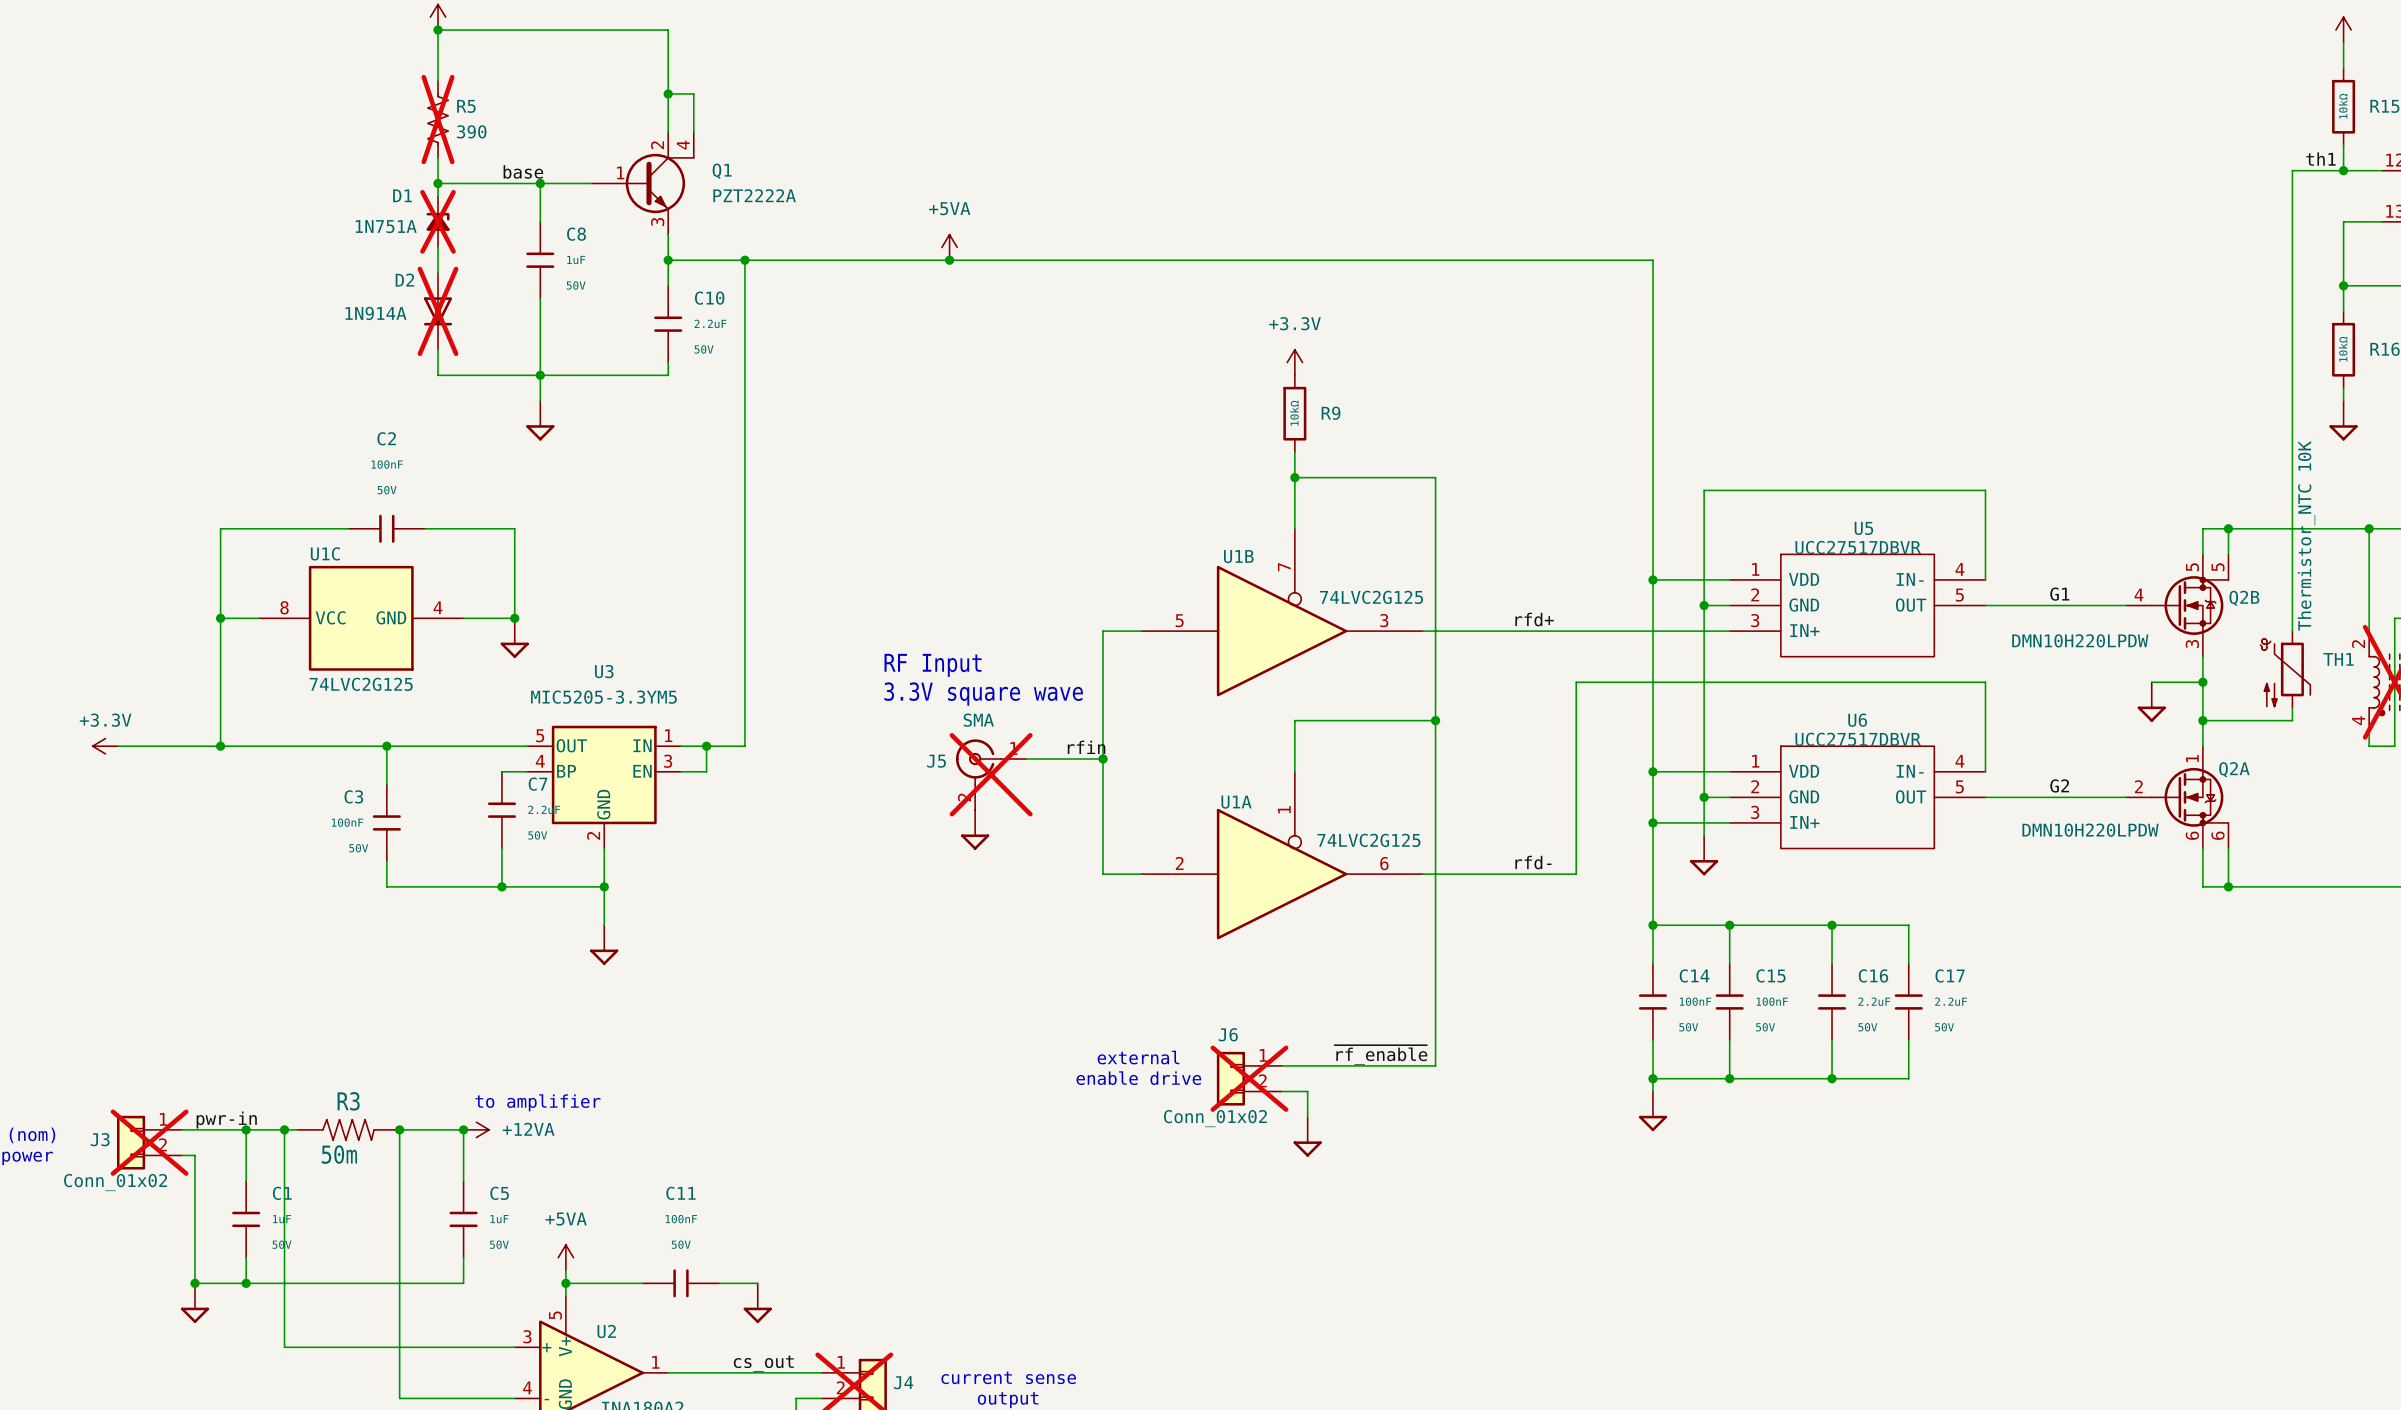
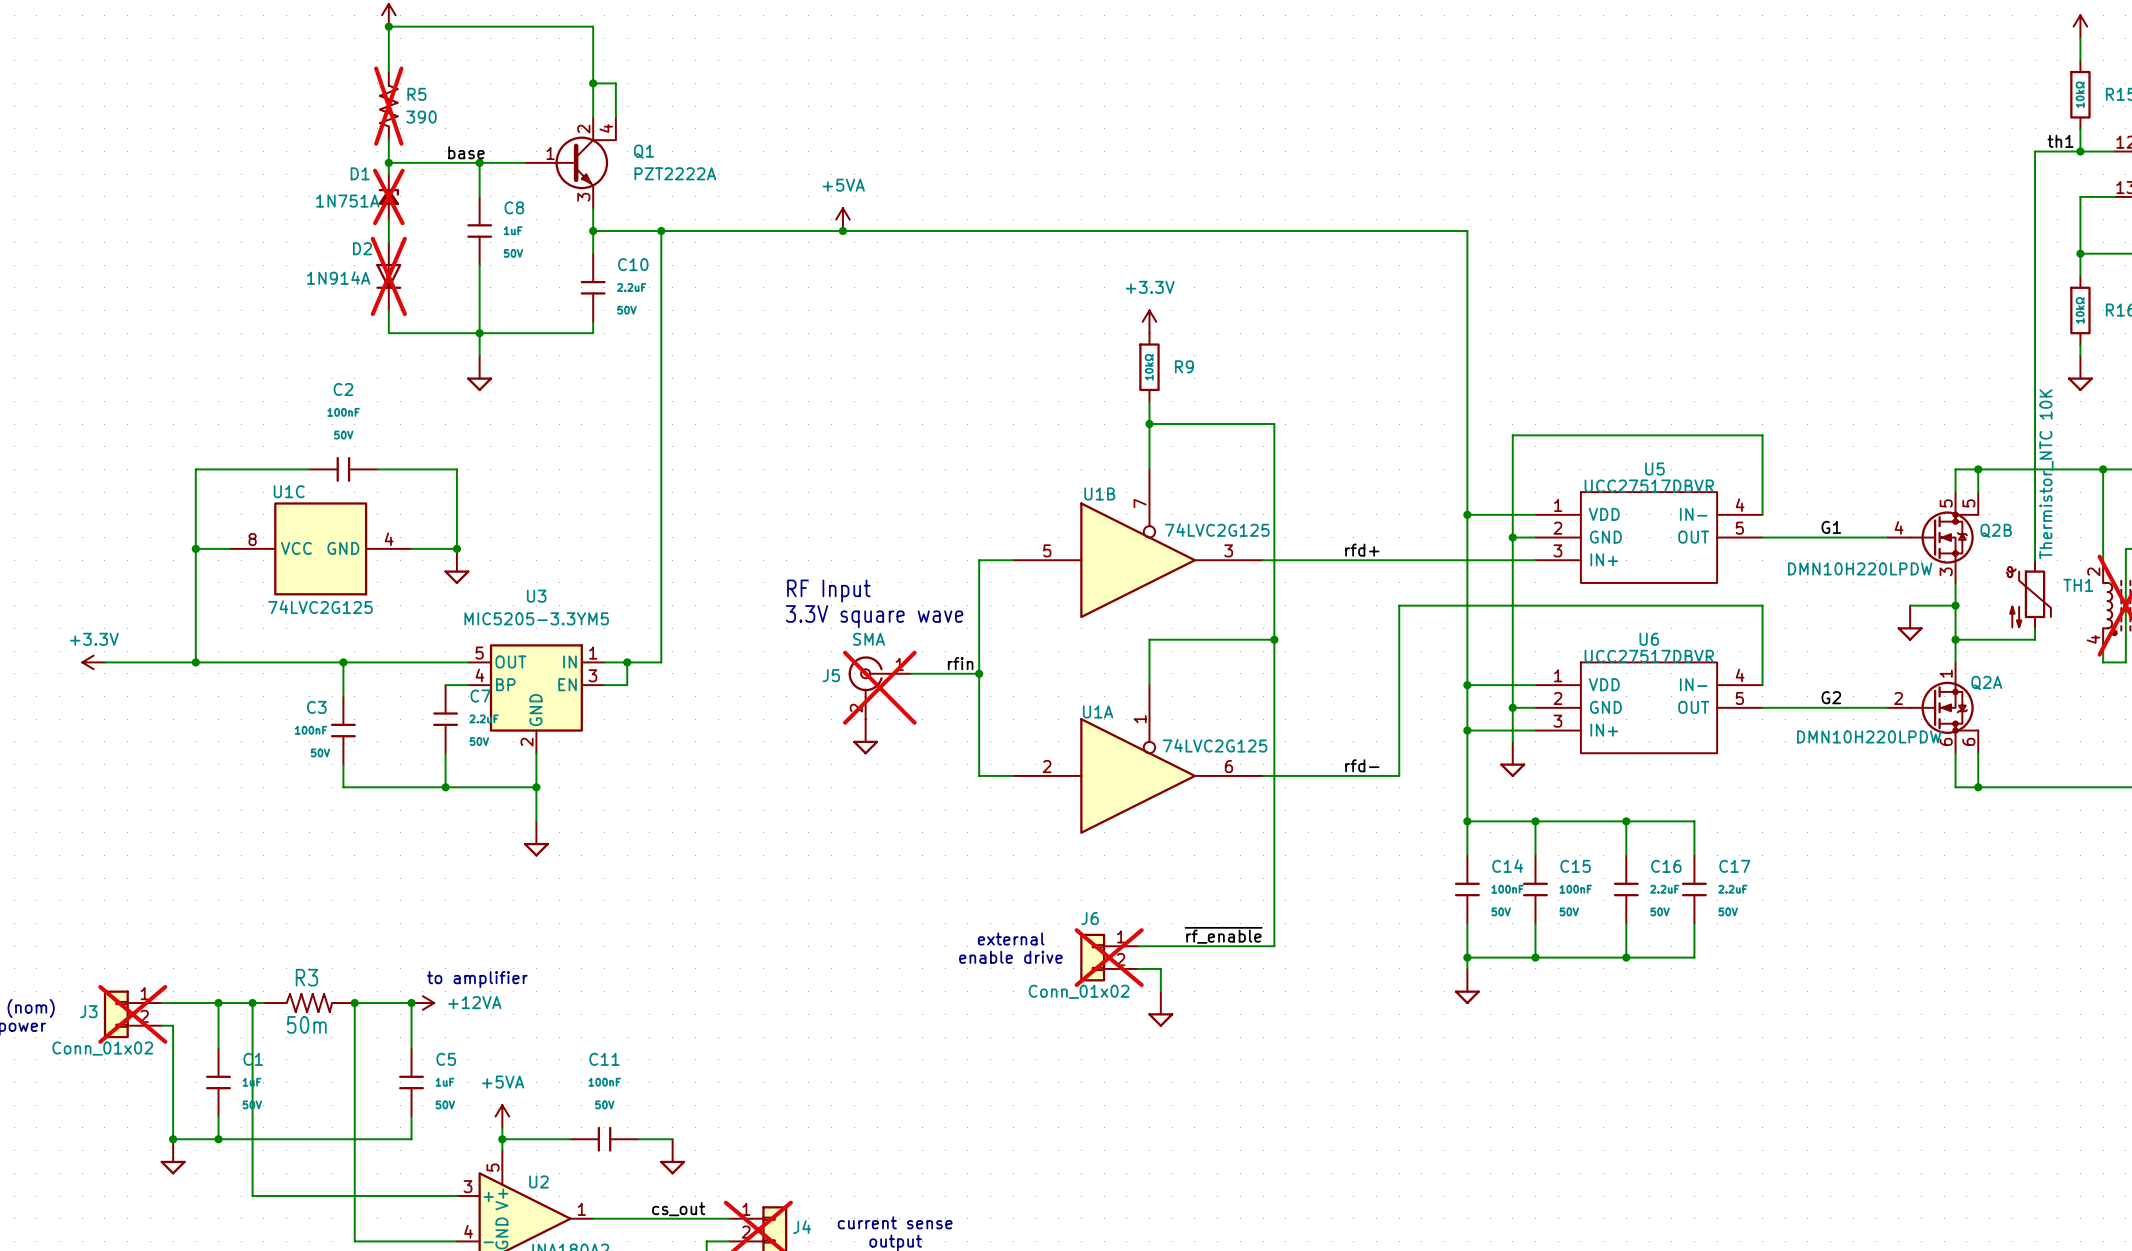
label: pwr-in (226, 1120) -> none

